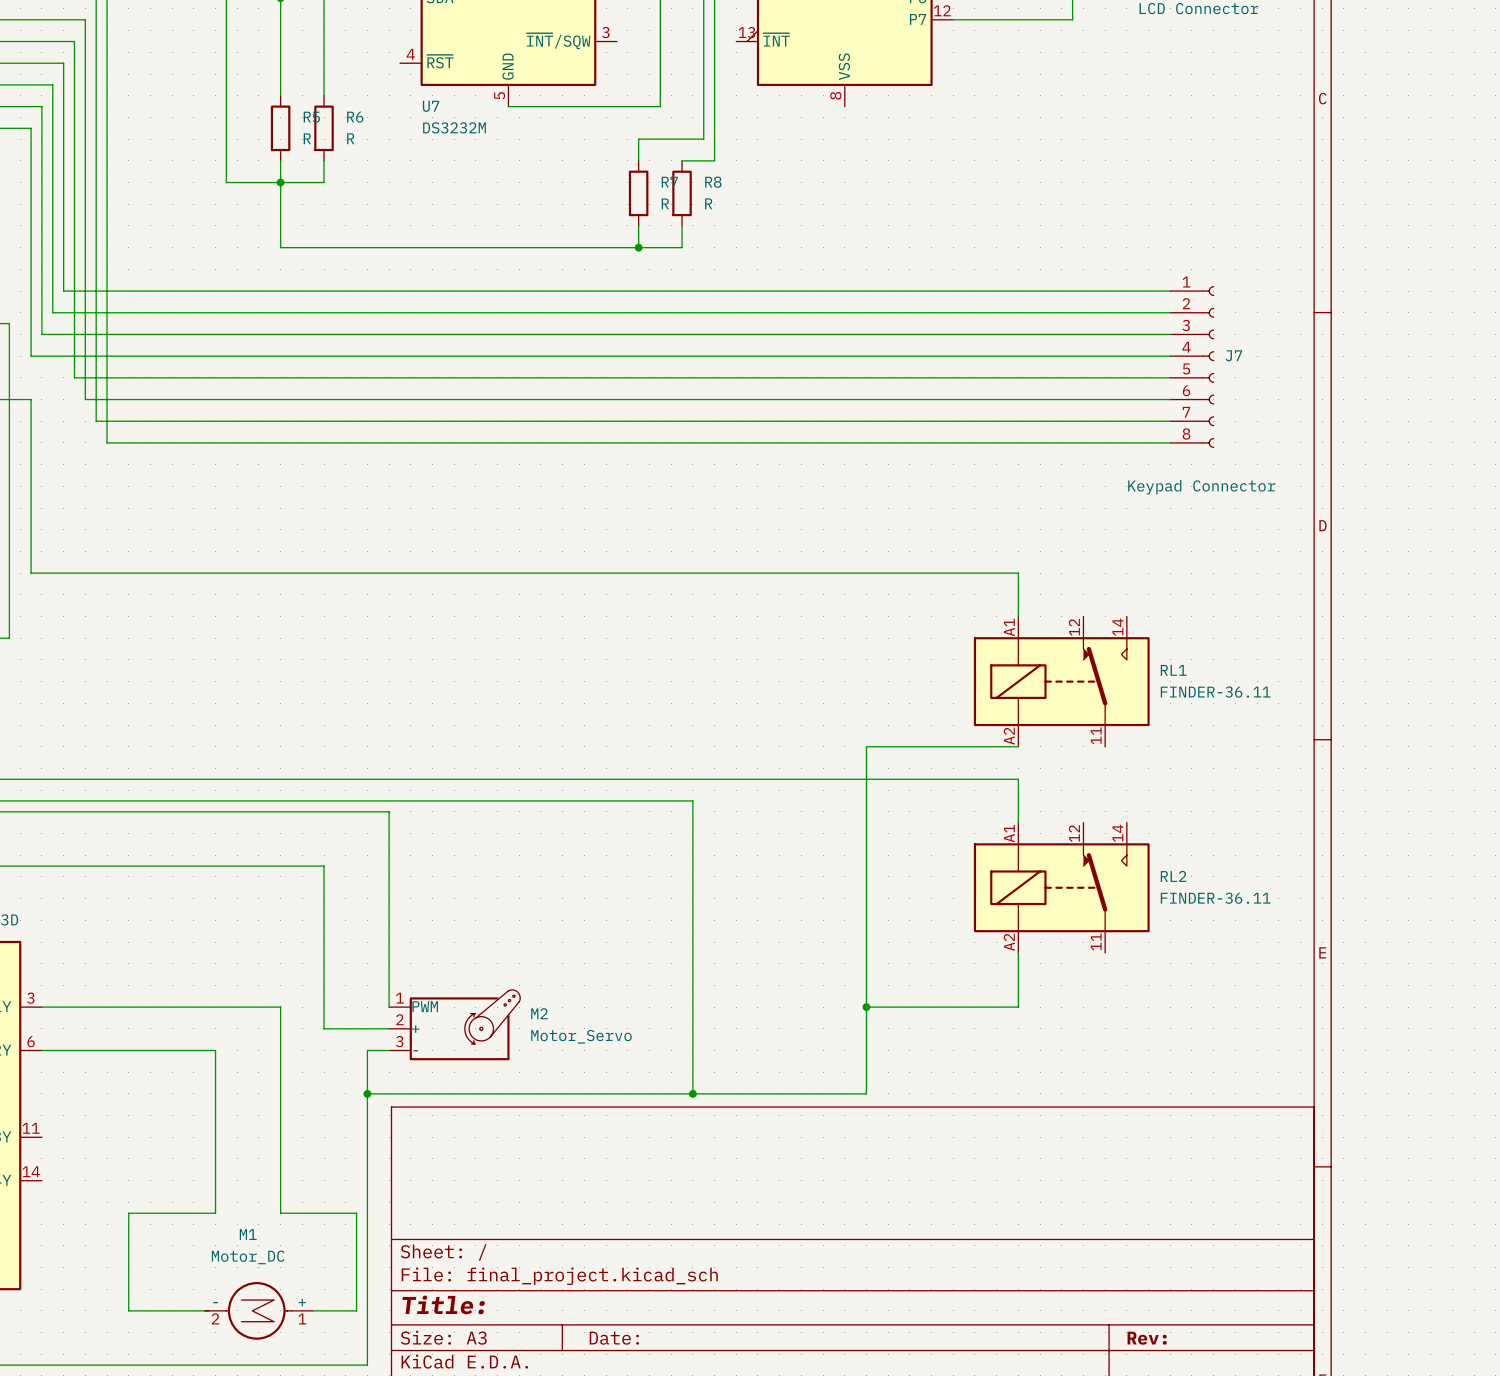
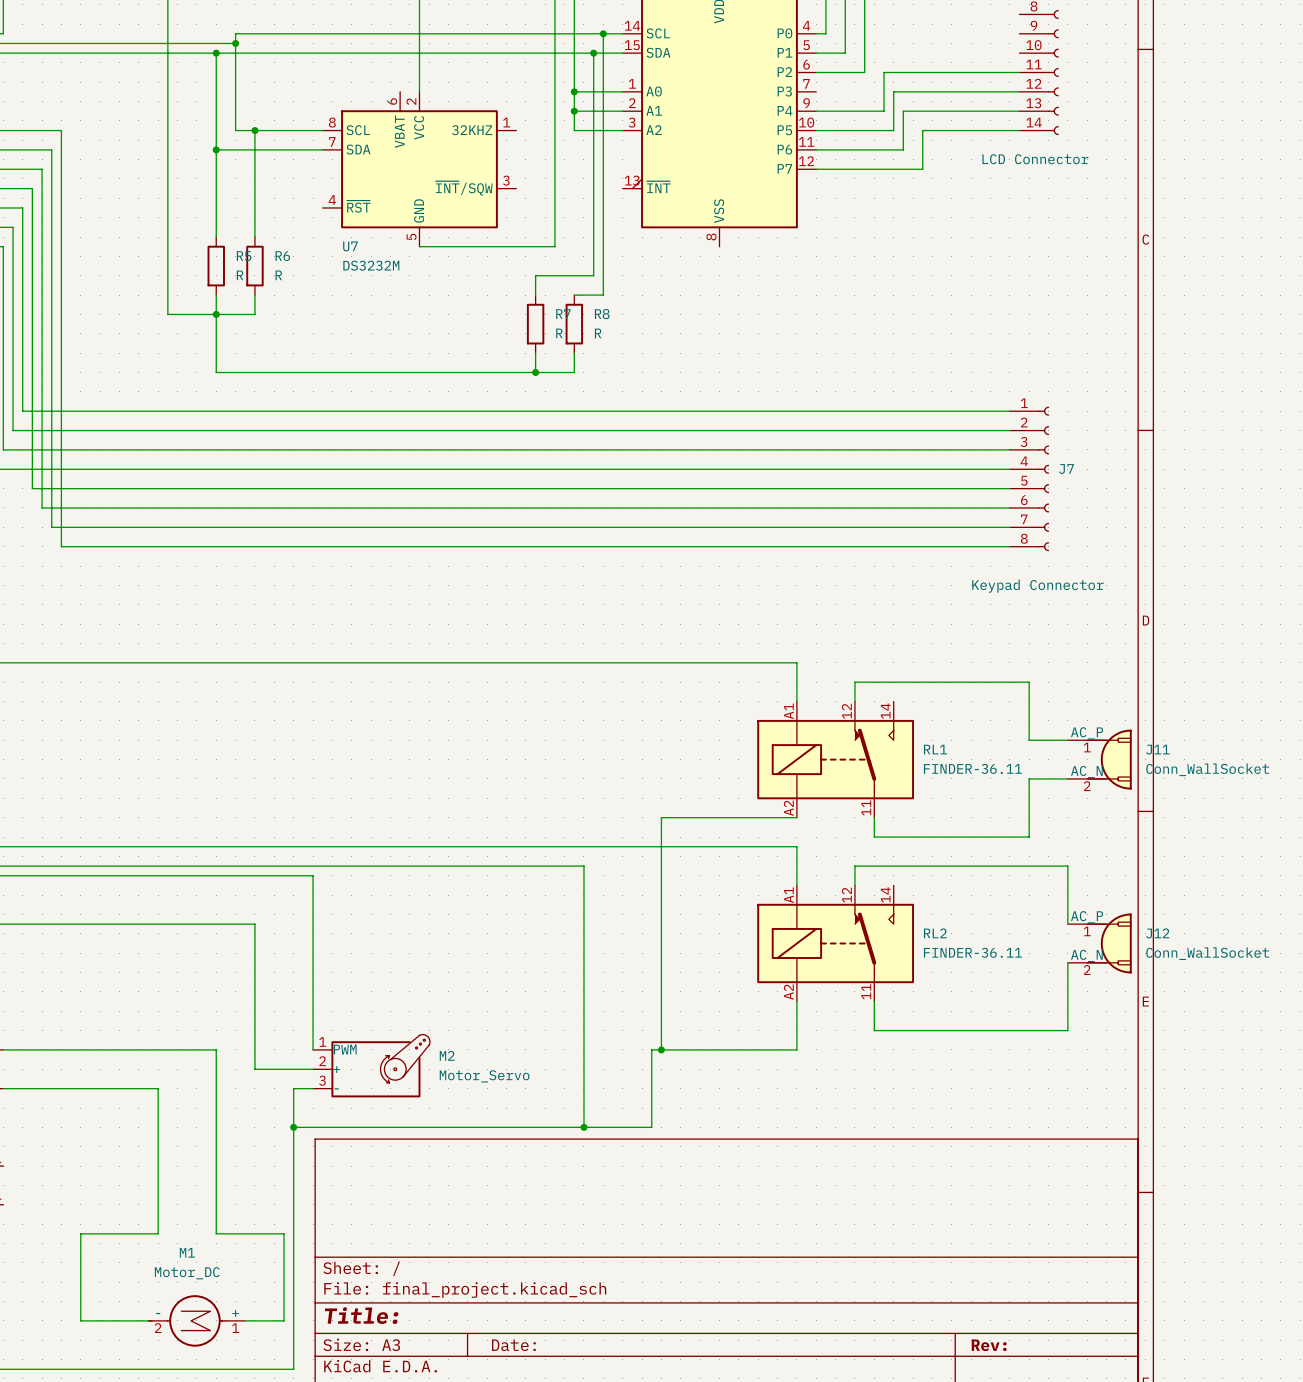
wire: (931, 573) (1018, 573) (1018, 616) -> (796, 662) (796, 701)
wire: none -> (854, 701) (854, 682) (1029, 682) (1029, 740) (1067, 740)
RL1 position: (1061, 681) -> (835, 759)
J11: none -> Conn_WallSocket (1099, 759)
wire: (866, 746) (866, 1093) (768, 1093) -> (738, 817) (661, 817) (661, 1049)
wire: (931, 746) (1018, 746) -> (1067, 778) (1029, 778) (1029, 837) (874, 837) (874, 817)
wire: (931, 779) (1018, 779) (1018, 822) -> (796, 846) (796, 885)
wire: none -> (854, 885) (854, 866) (1067, 866) (1067, 924)
RL2 position: (1061, 887) -> (835, 943)
J12: none -> Conn_WallSocket (1099, 943)
wire: none -> (1067, 962) (1067, 1030) (874, 1030)
wire: (1018, 985) (1018, 1007) (931, 1007) -> (796, 1001) (796, 1049)
junction: none -> (661, 1049)
wire: none -> (738, 1049) (651, 1049) (651, 1127)
junction: (866, 1007) -> none

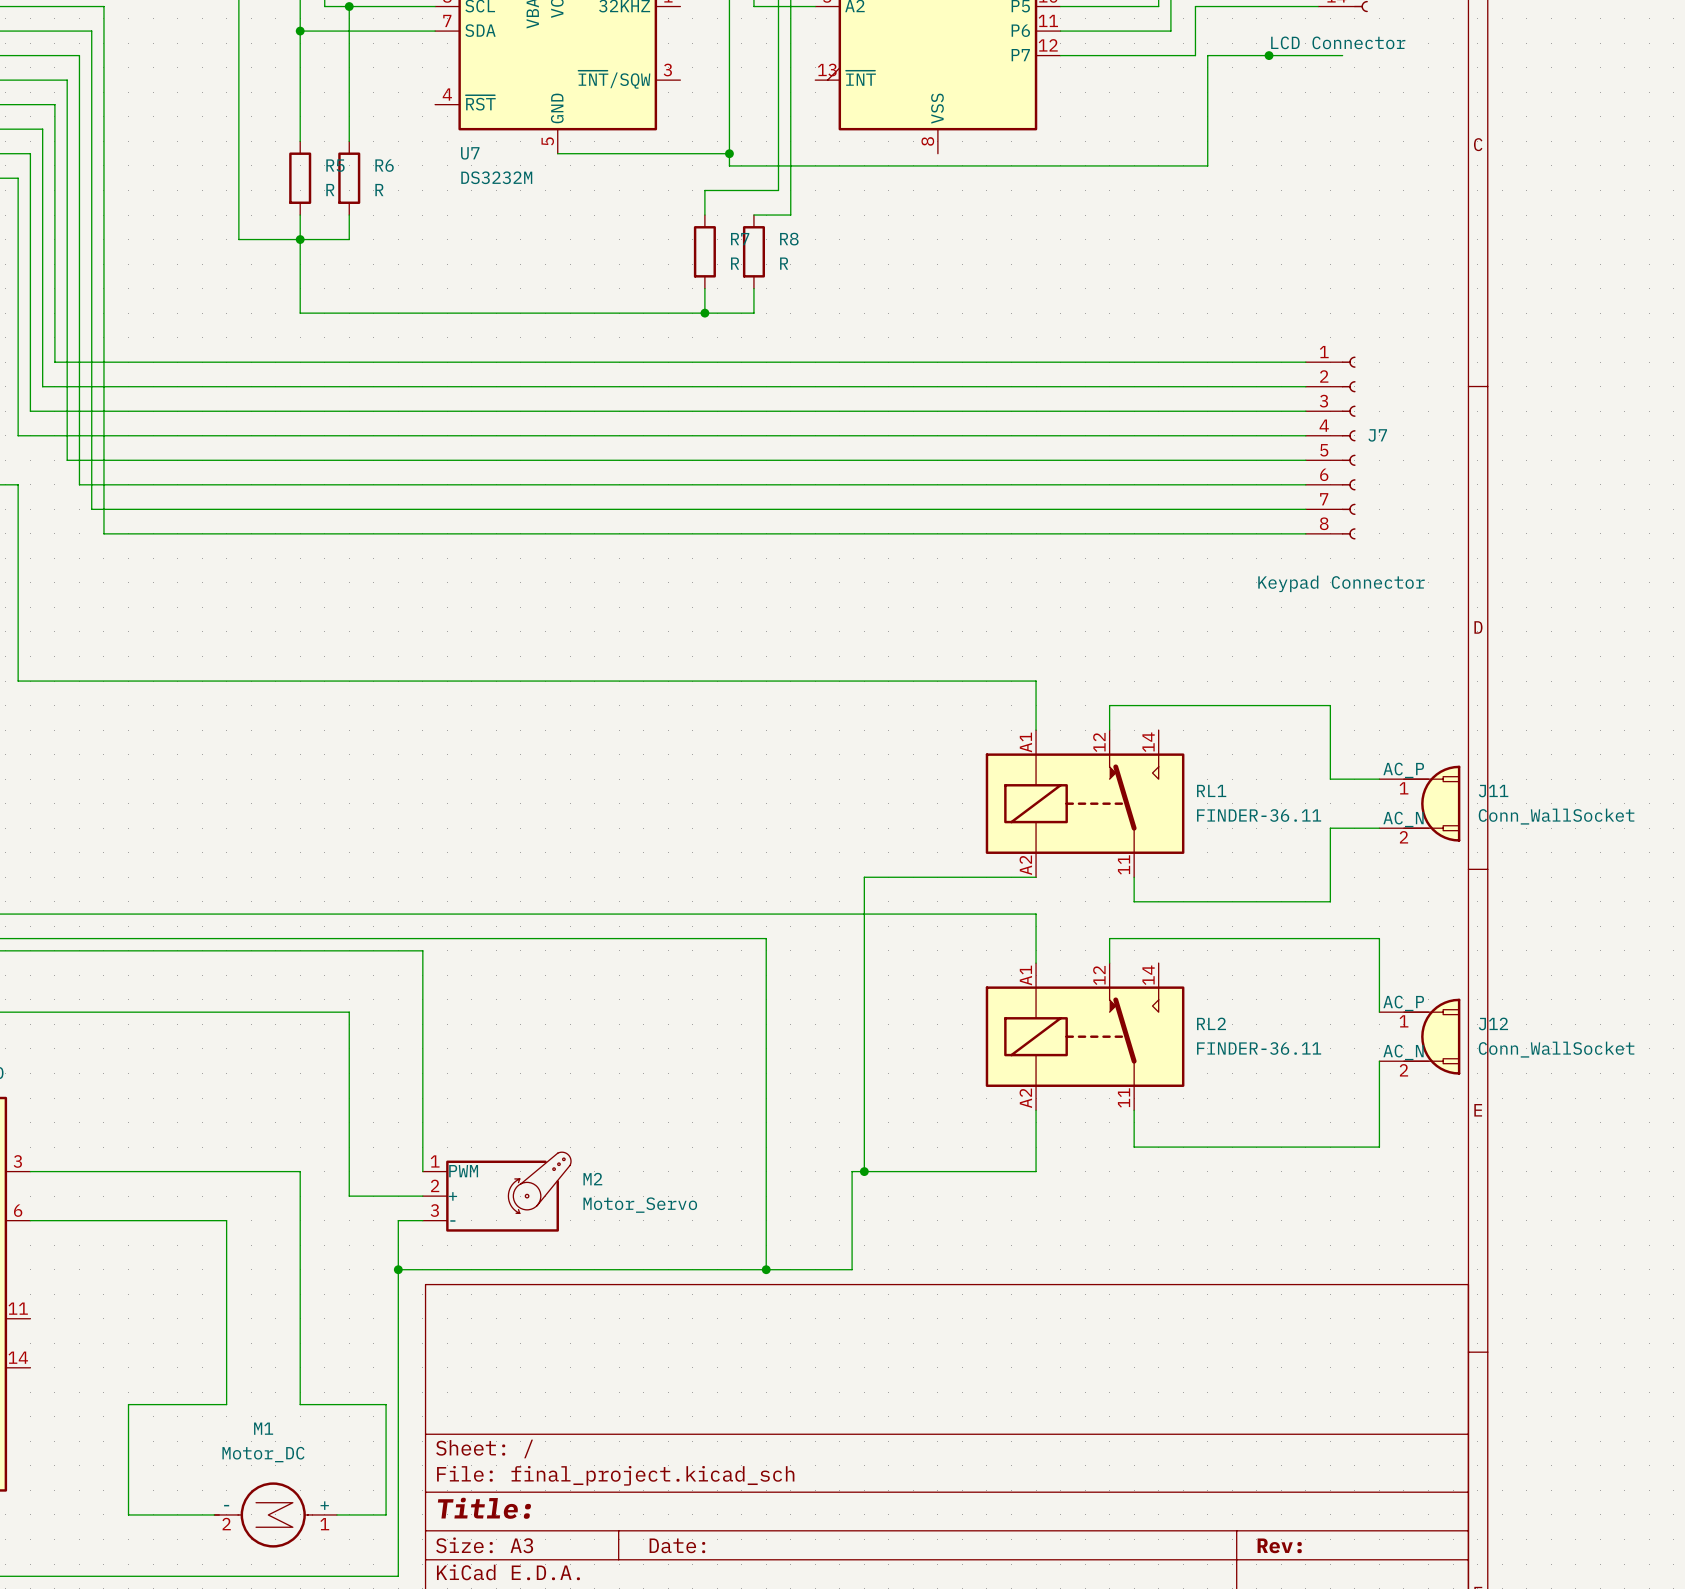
junction: none -> (1269, 55)
wire: none -> (1342, 55) (1207, 55) (1207, 165) (729, 165) (729, 153)
junction: none -> (729, 153)

